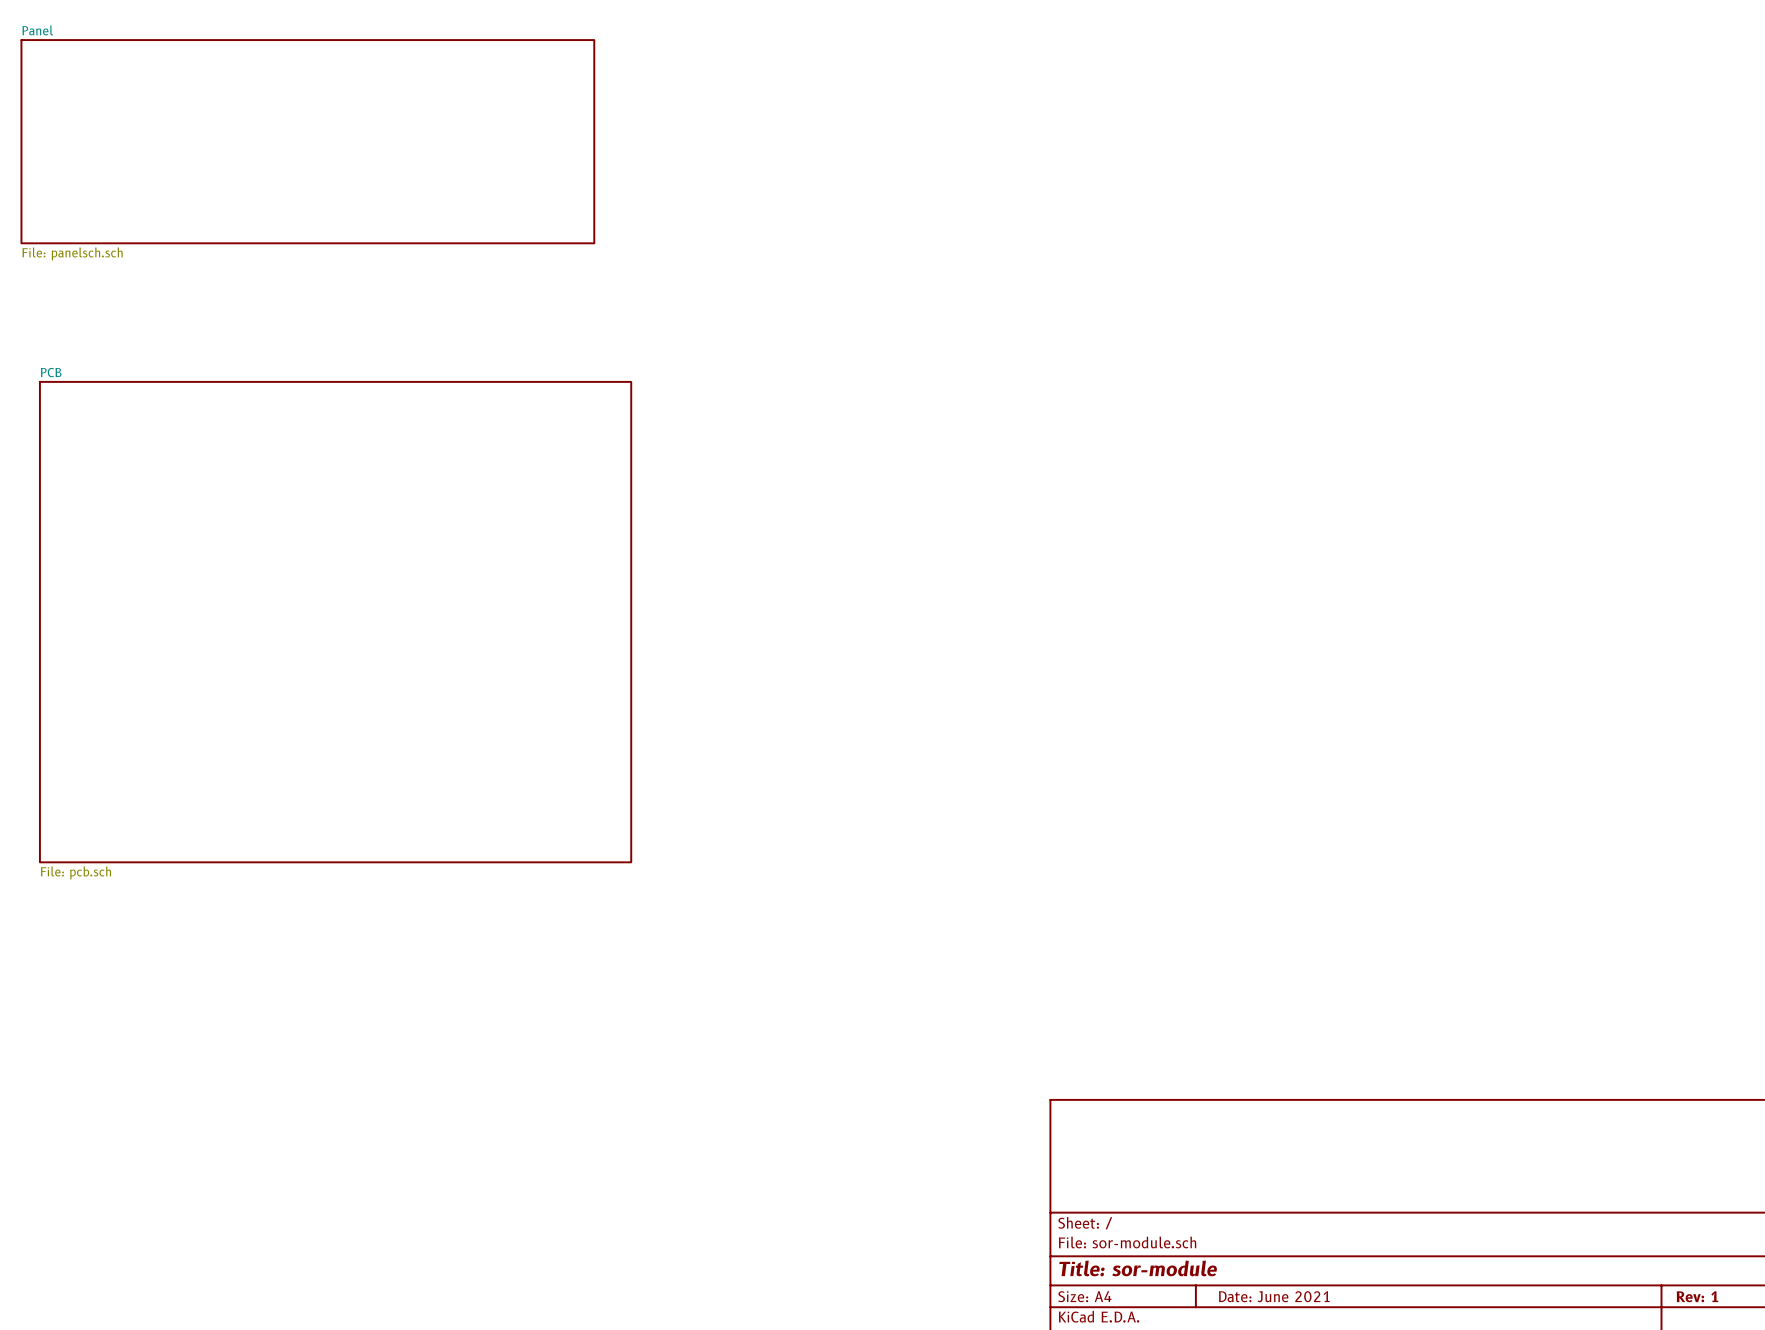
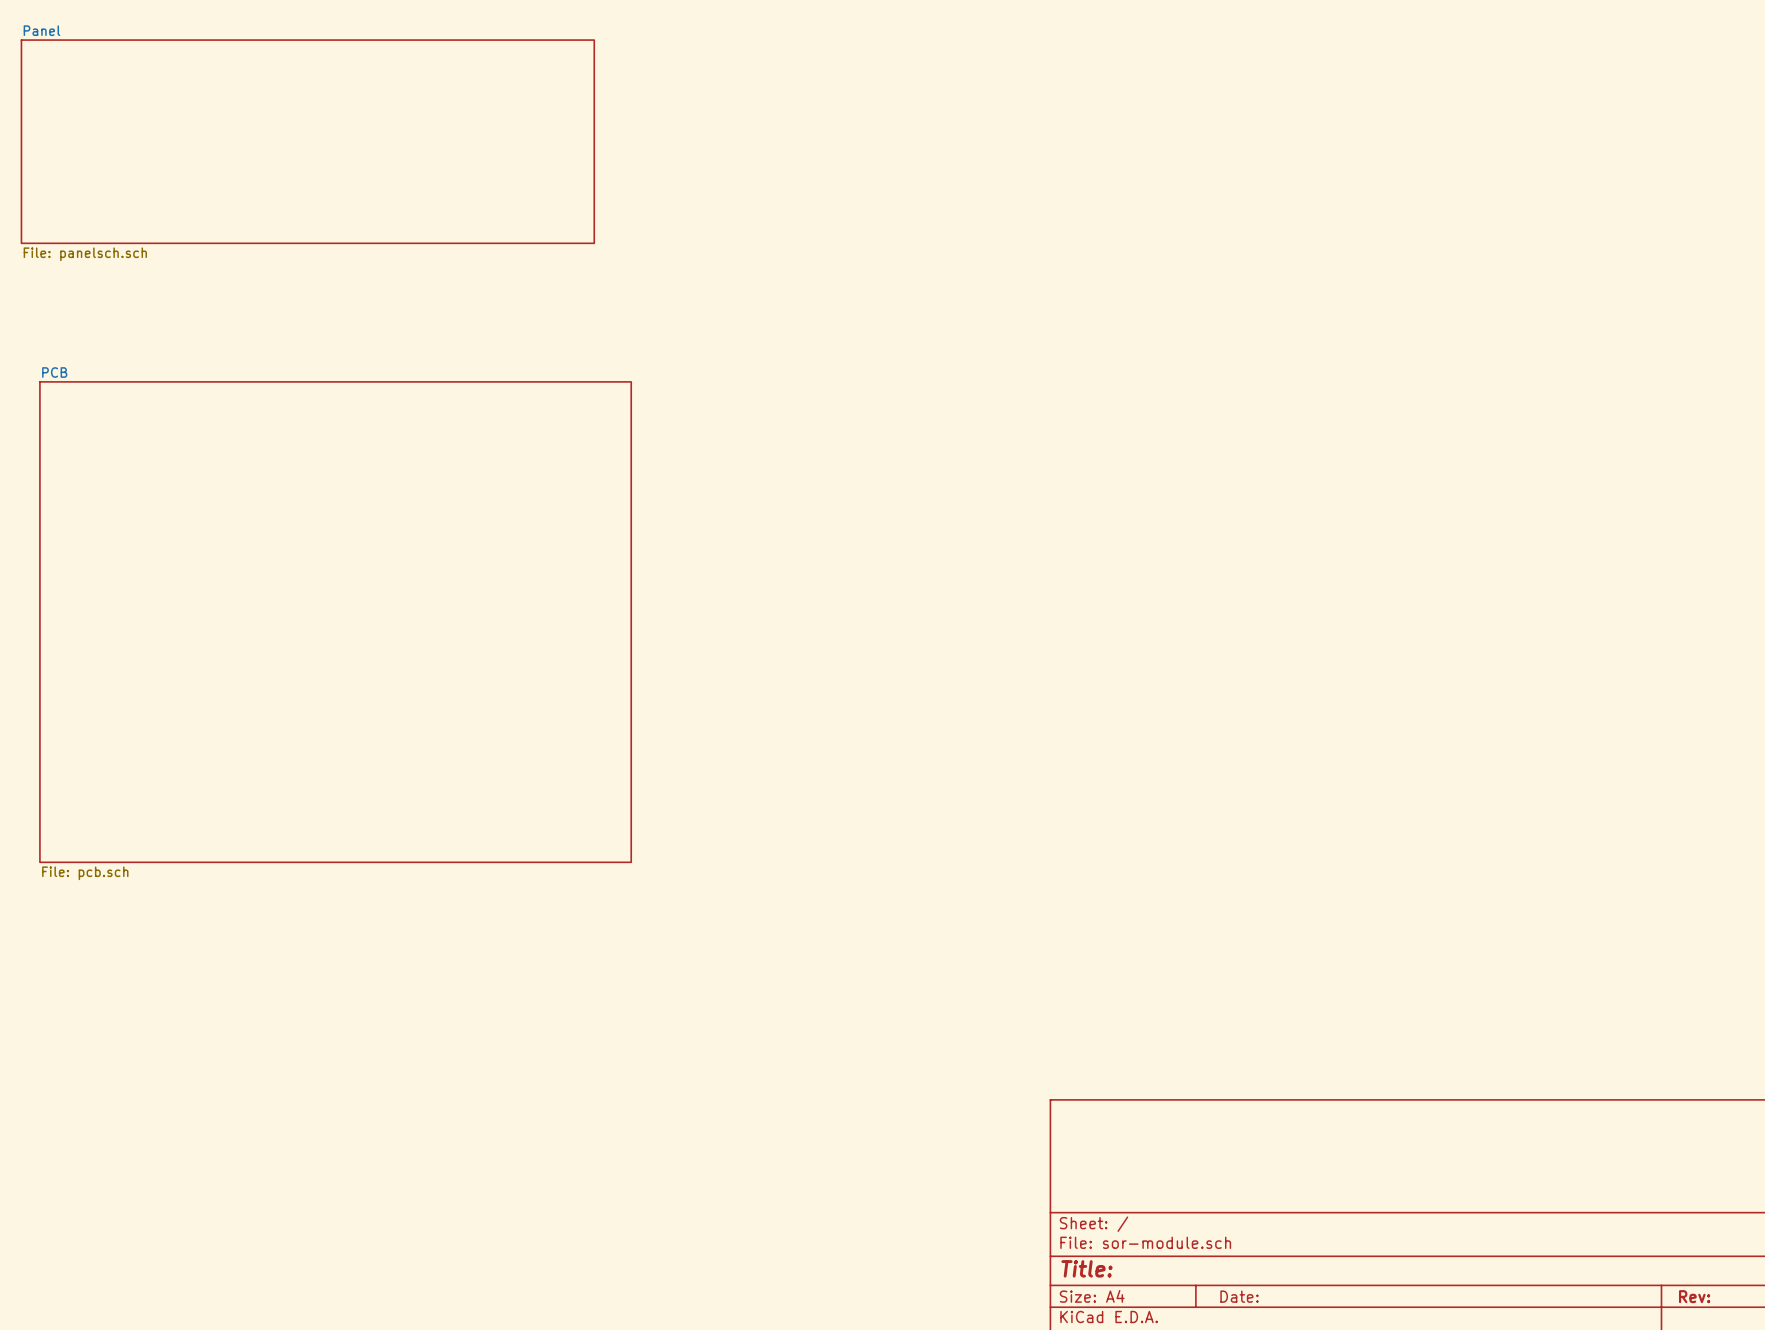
title block: Title: sor-module (1138, 1268) -> Title: (1087, 1268)
title block: Date: June 2021 (1274, 1296) -> Date: (1239, 1296)
title block: Rev: 1 (1697, 1296) -> Rev: (1694, 1296)

